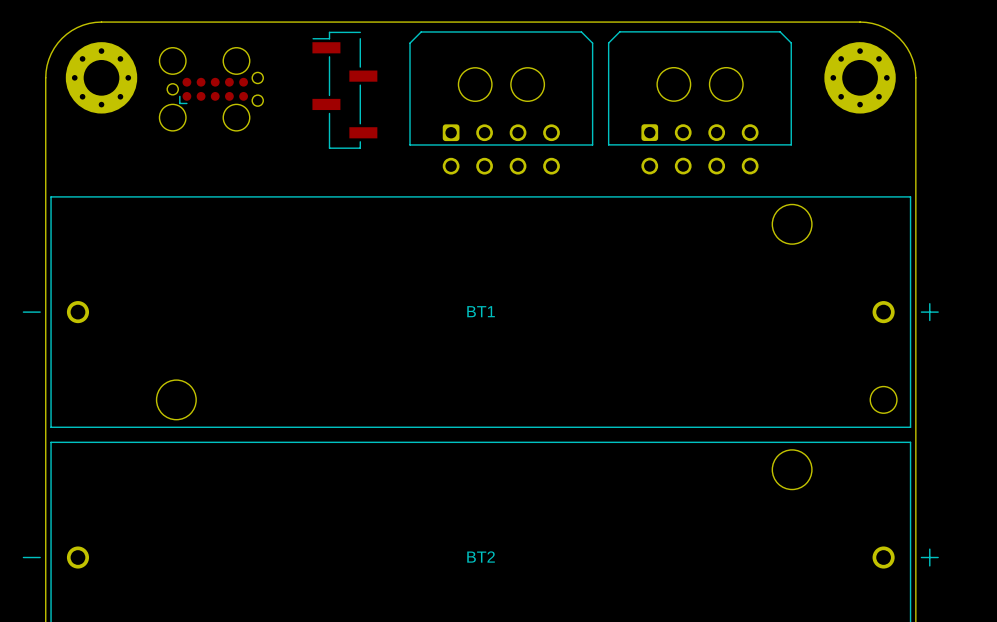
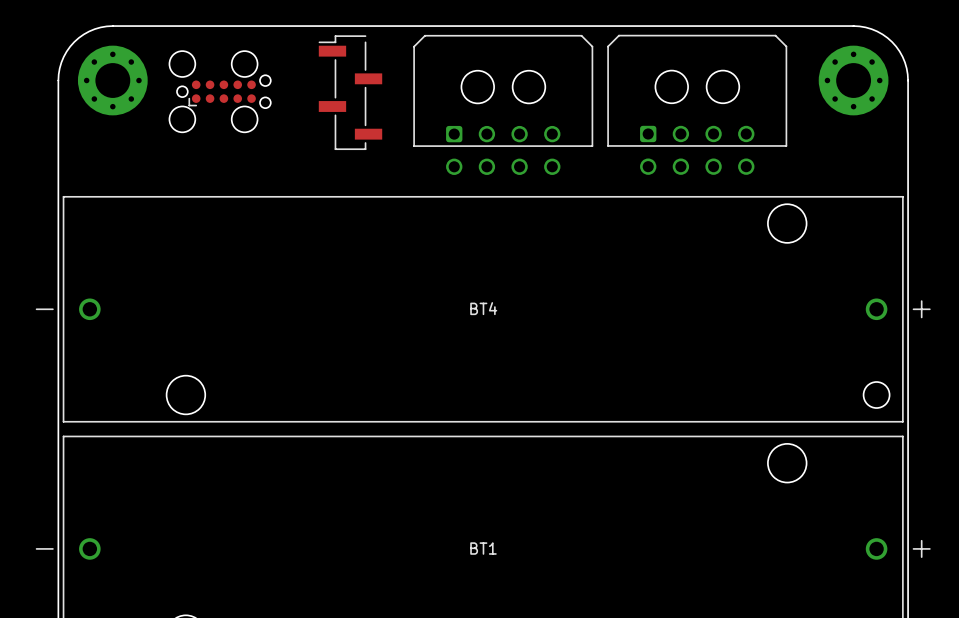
BT1 name: BT1 (481, 311) -> BT4 (483, 308)
BT2 name: BT2 (481, 557) -> BT1 (483, 548)

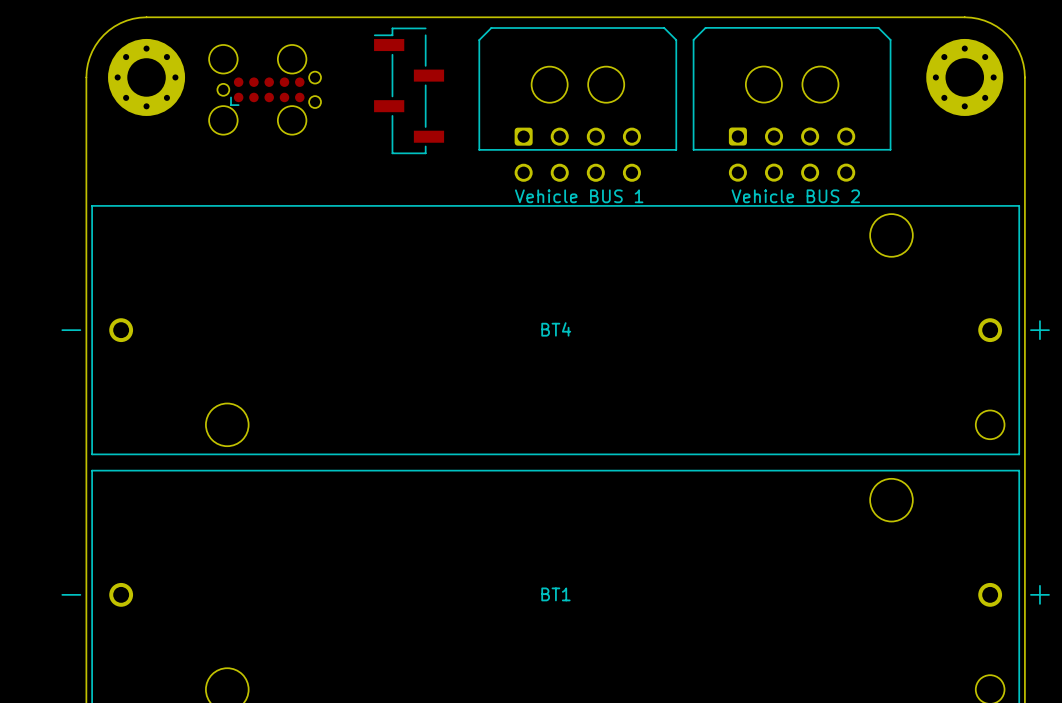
text: none -> Vehicle BUS 1 (579, 196)
text: none -> Vehicle BUS 2 (795, 196)

